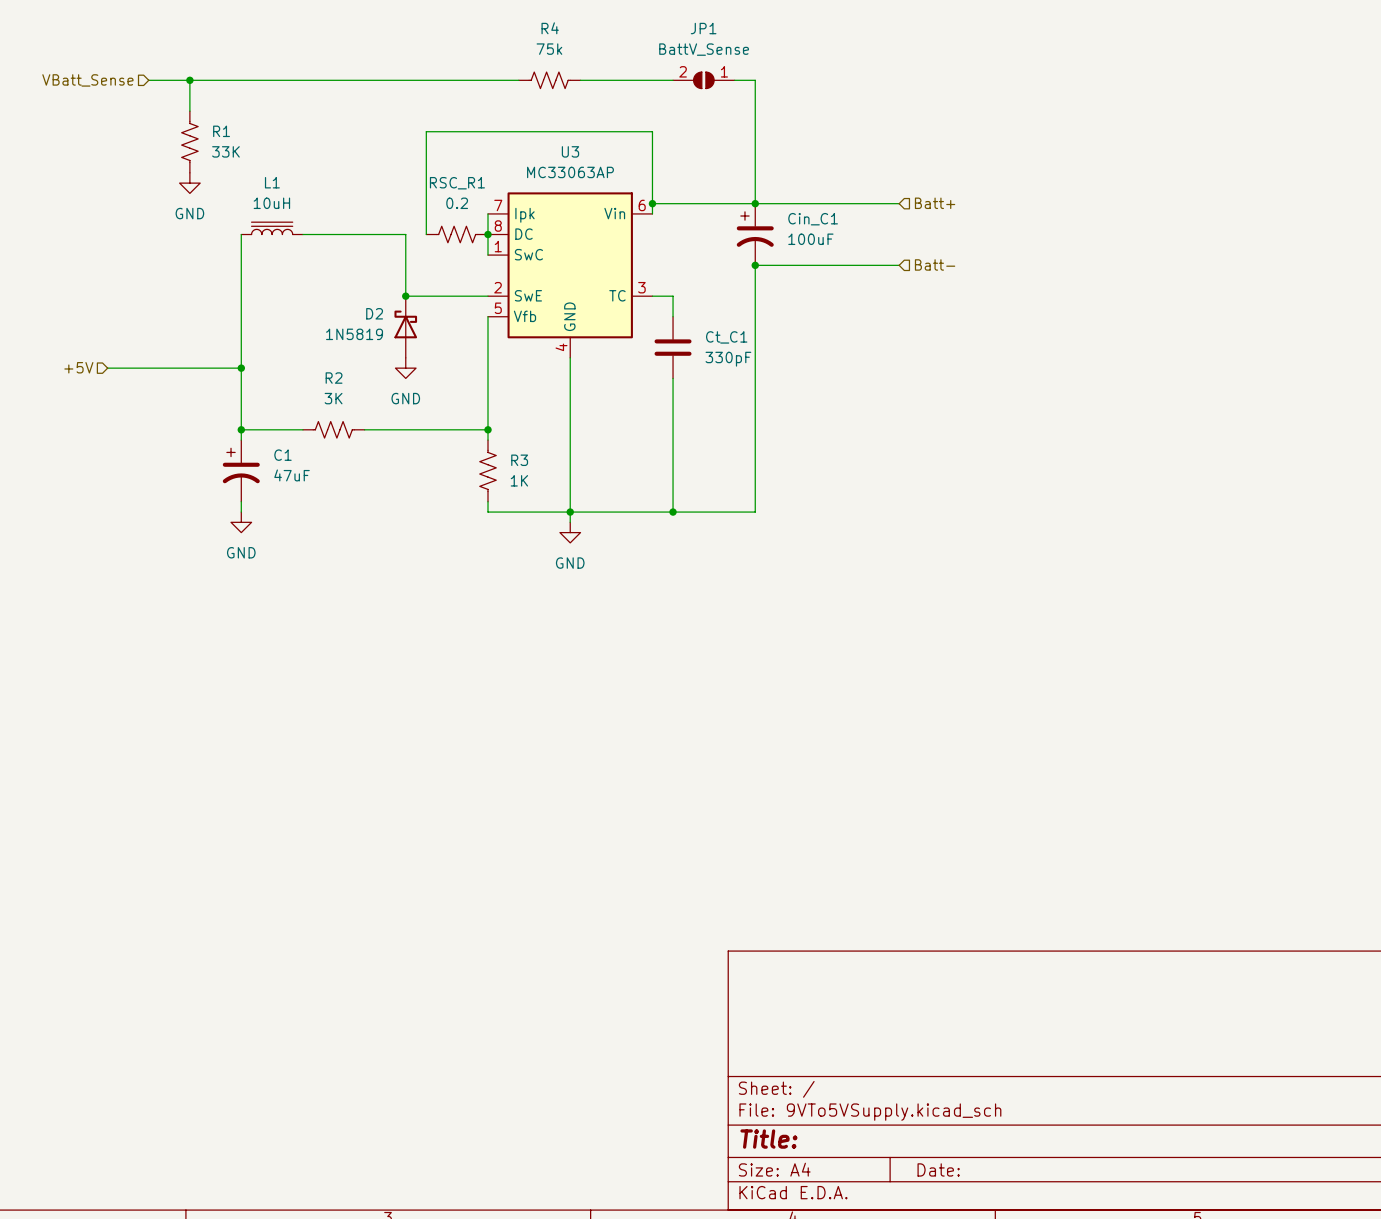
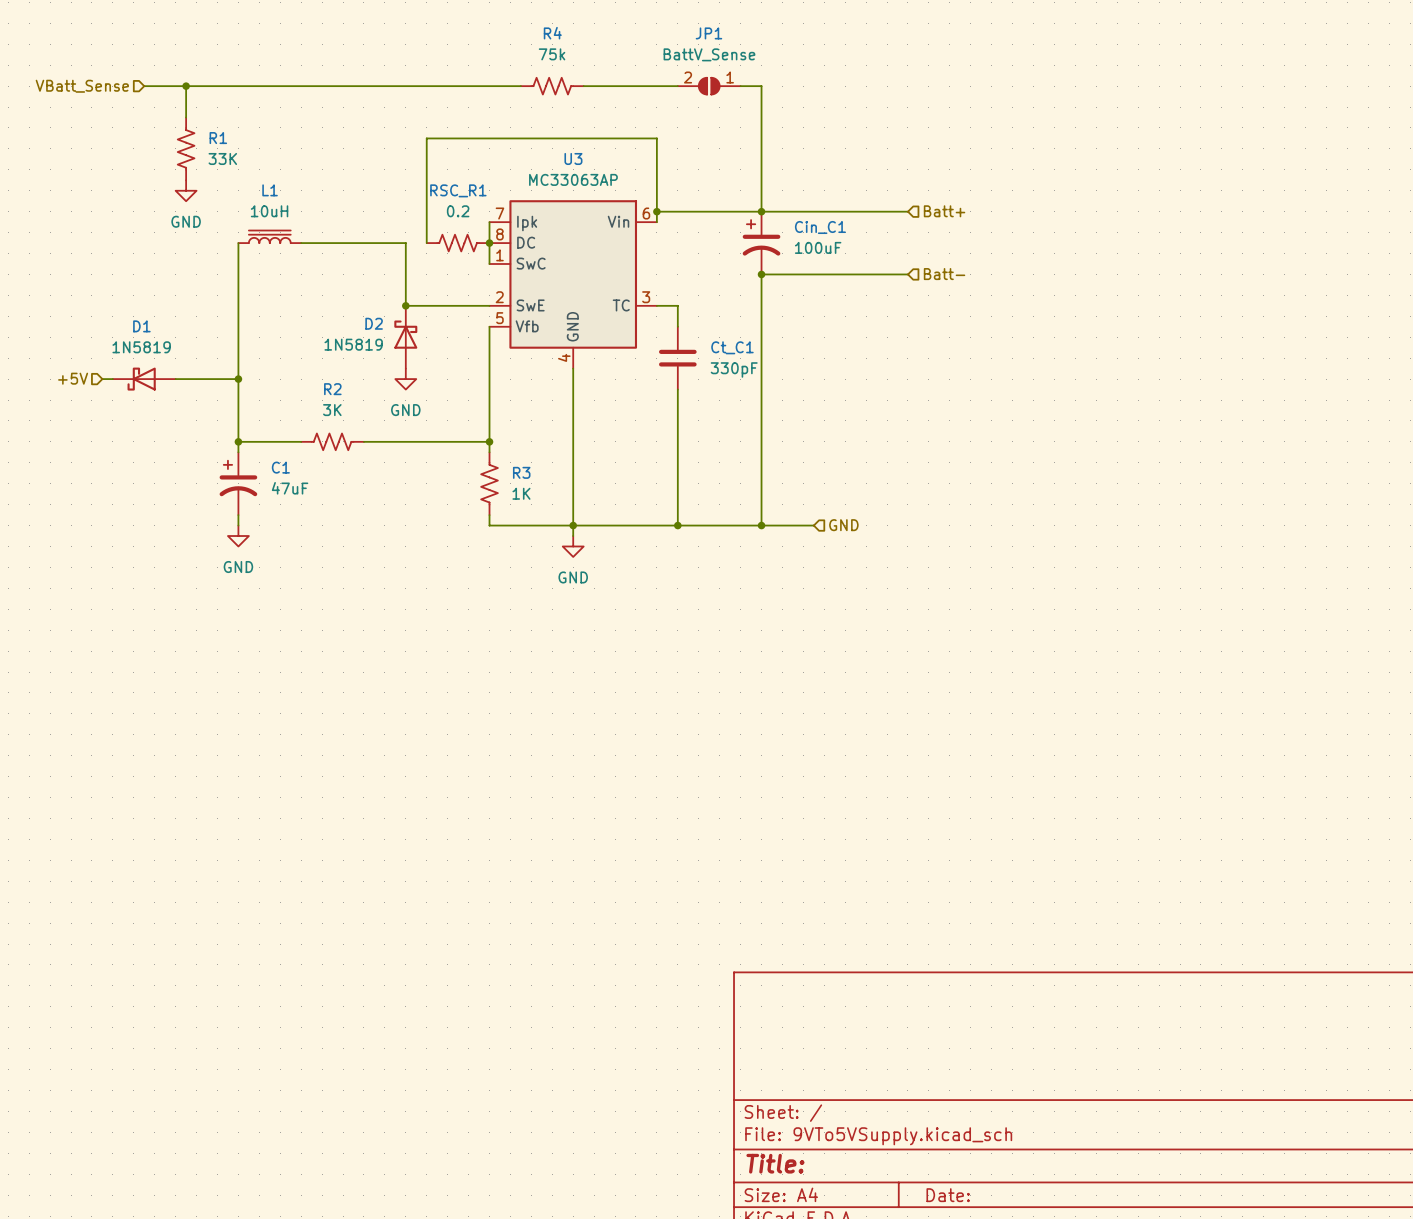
D1: none -> 1N5819 (144, 379)
hierarchical label: none -> GND (843, 525)
wire: none -> (761, 525) (813, 525)
junction: none -> (761, 525)

